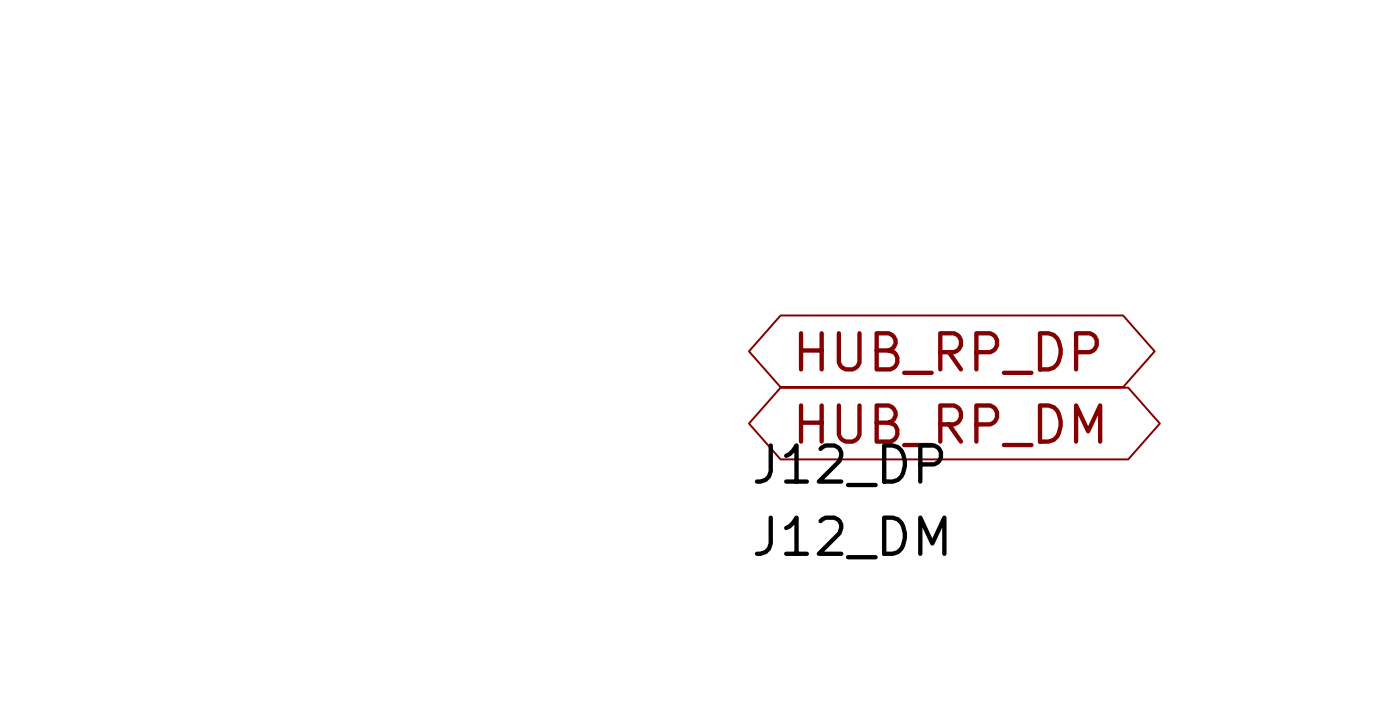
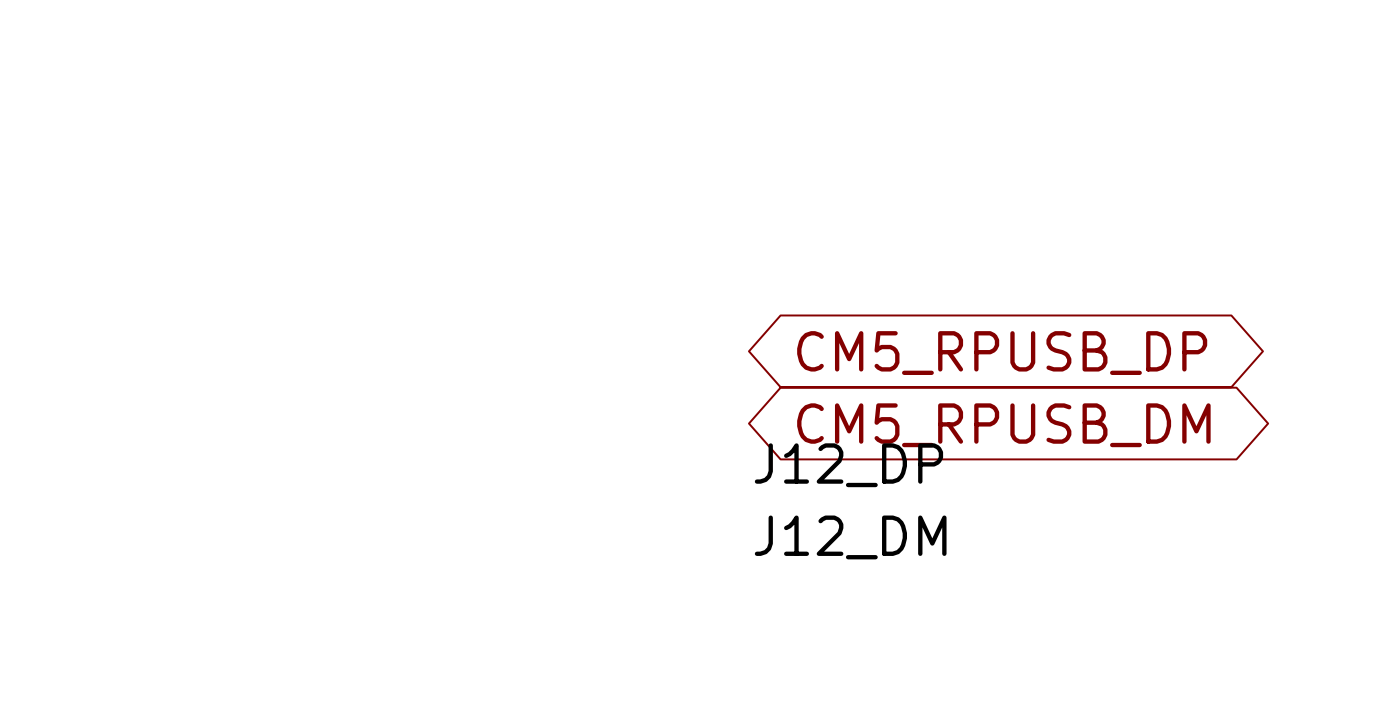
global label: HUB_RP_DP (948, 353) -> CM5_RPUSB_DP (1002, 353)
global label: HUB_RP_DM (950, 425) -> CM5_RPUSB_DM (1003, 425)

